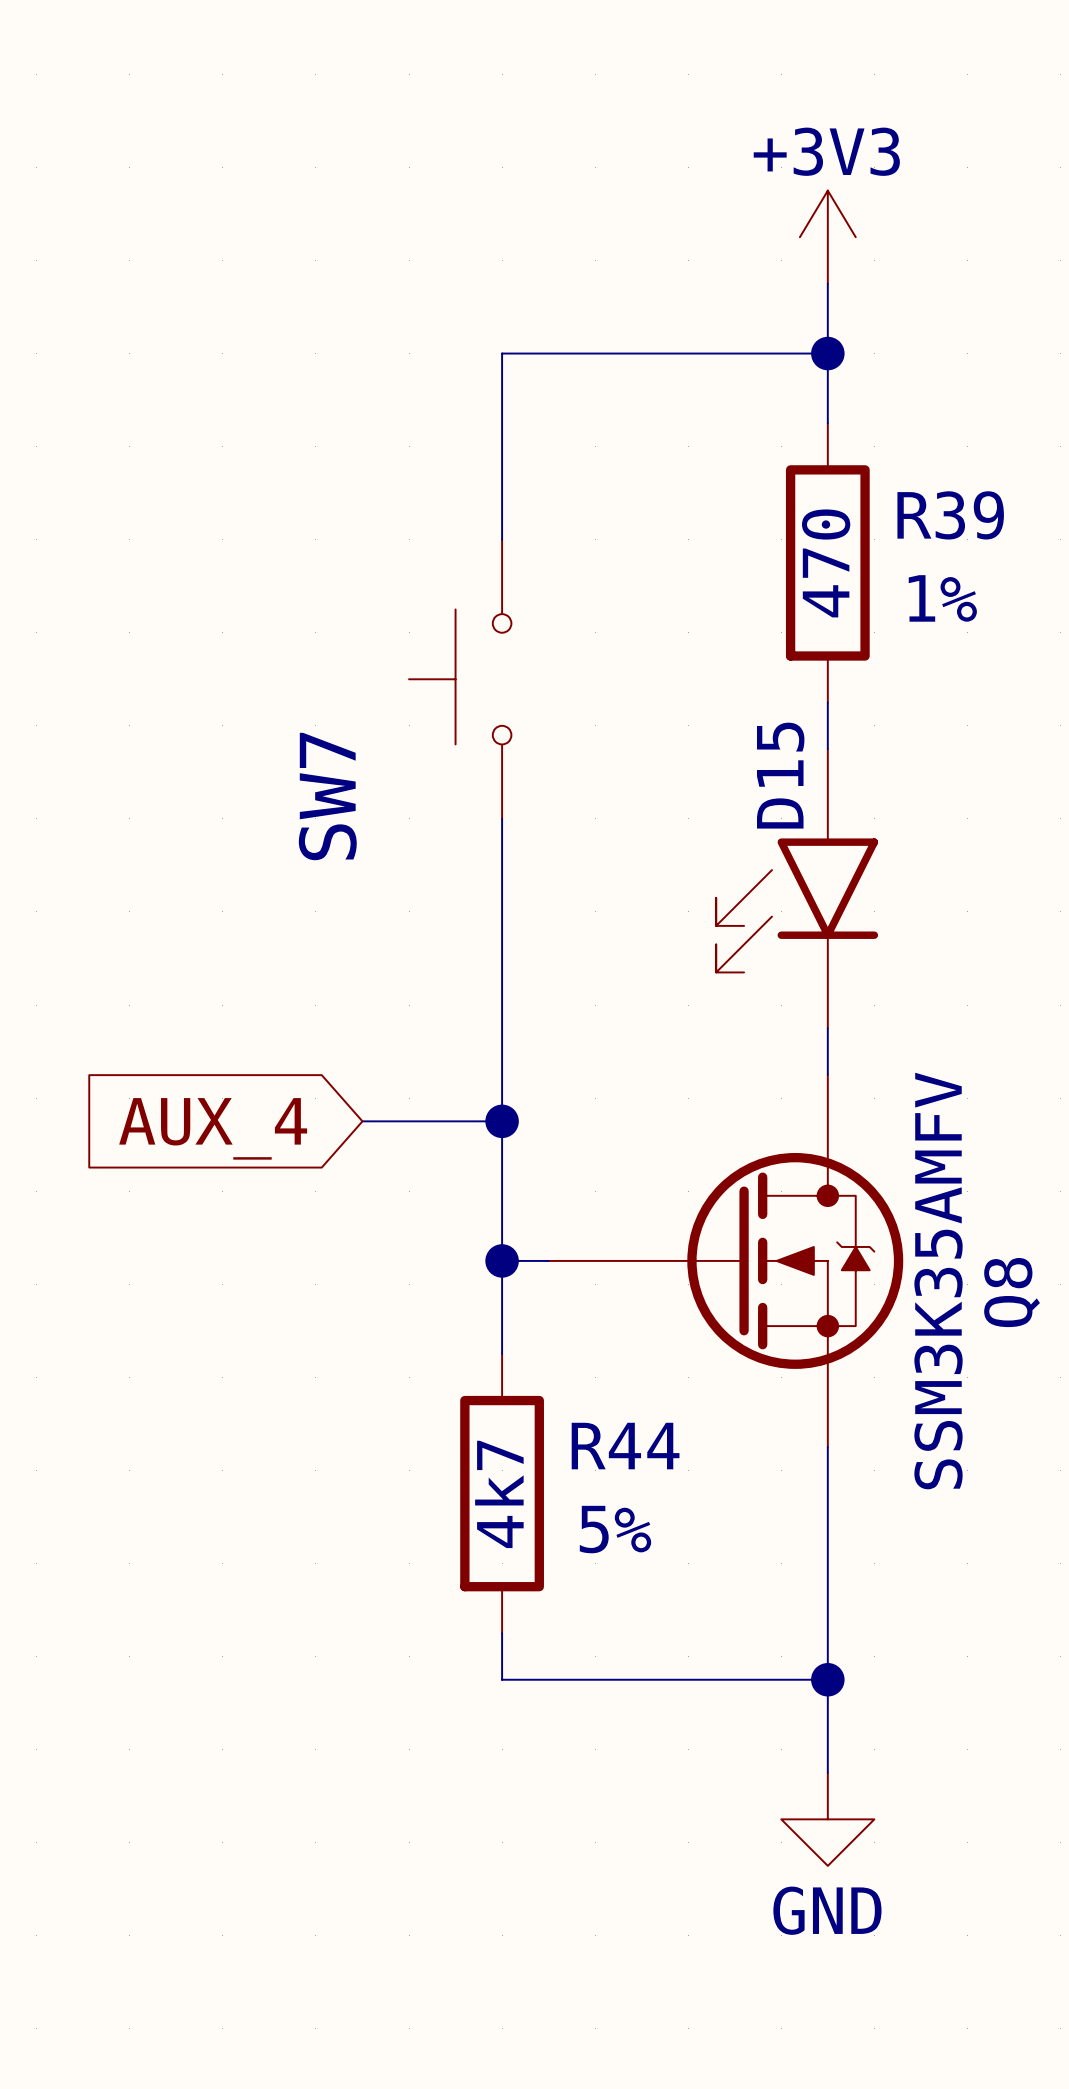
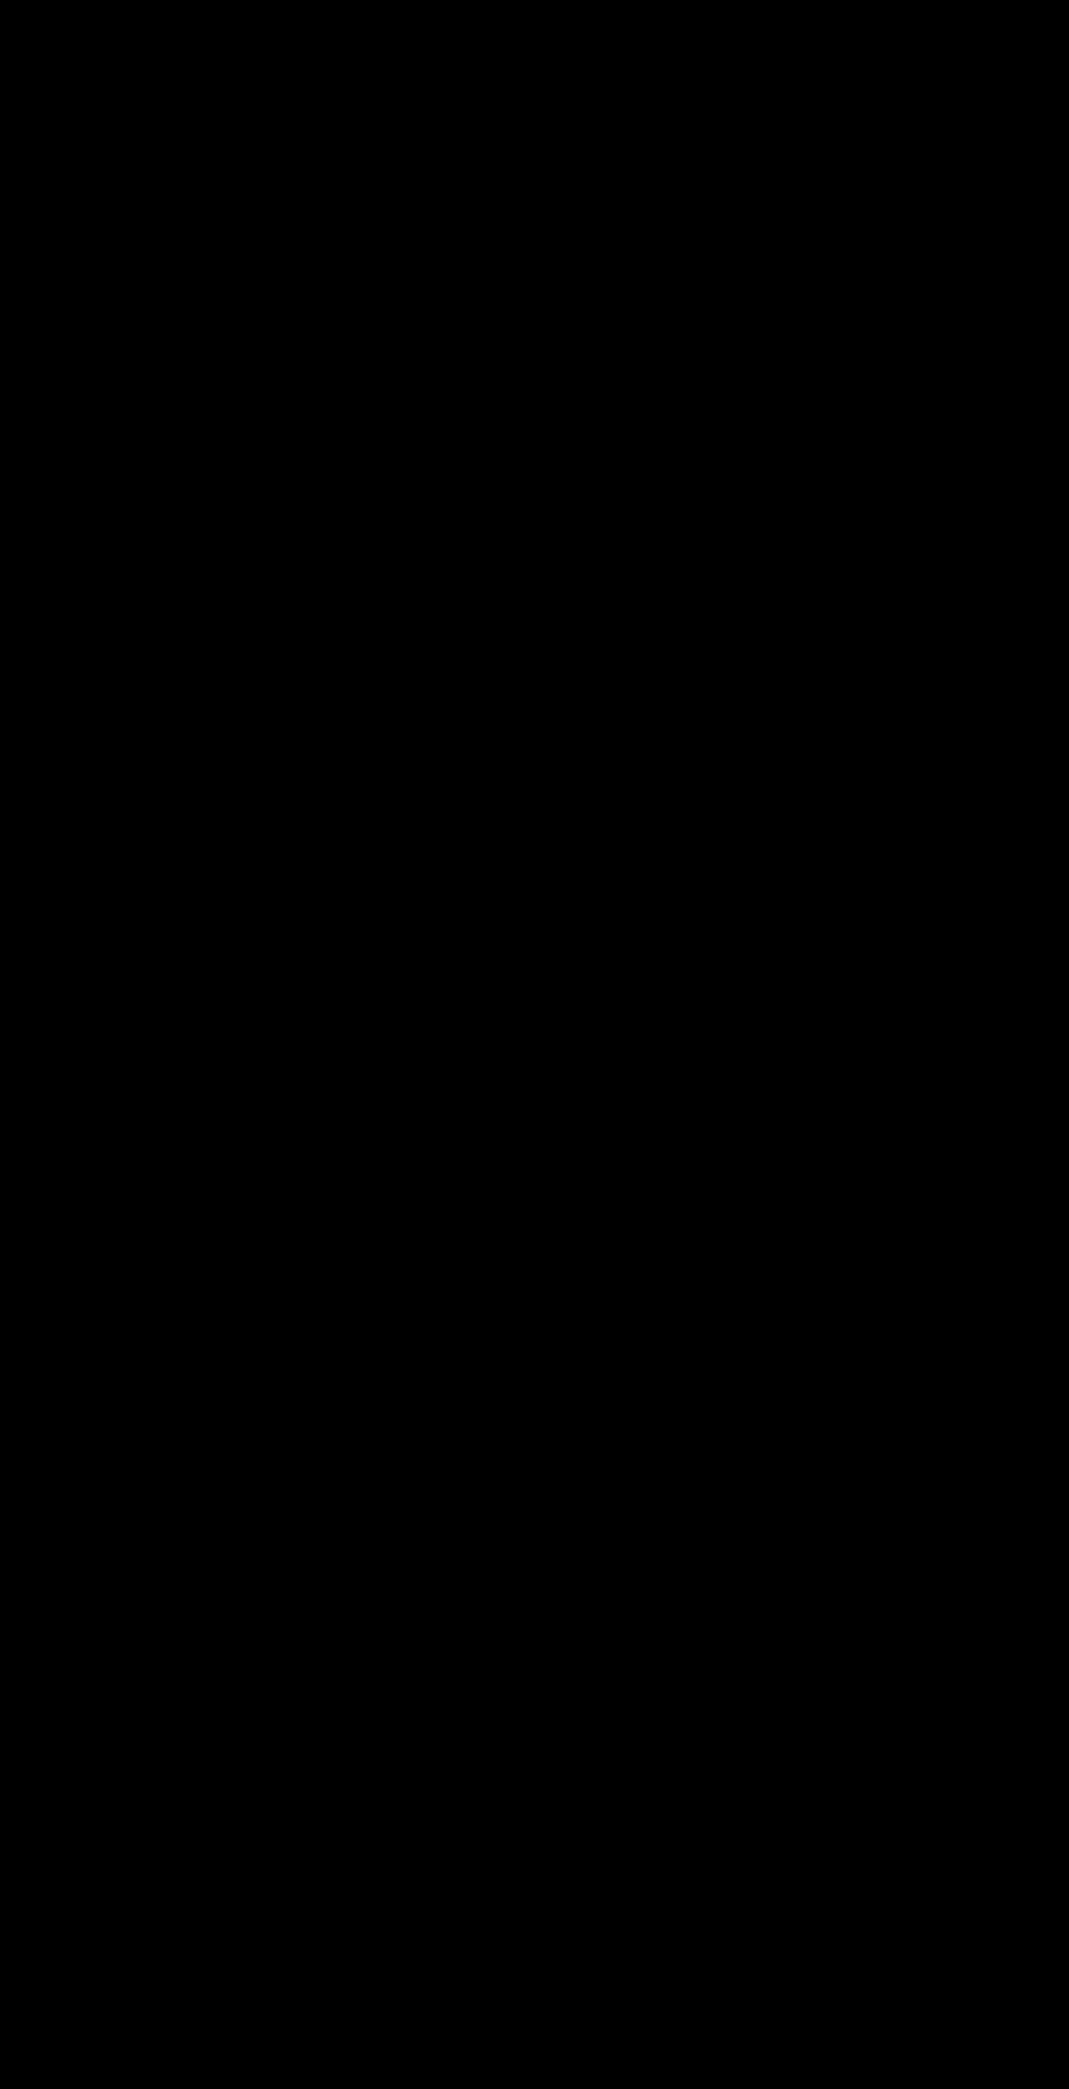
power symbol: +3V3 (827, 237) -> none
wire: (827, 283) (827, 423) -> none
wire: (827, 353) (502, 353) (502, 539) -> none
junction: (827, 353) -> none
R39: (827, 562) -> none
SW7: (460, 679) -> none
wire: (827, 702) (827, 749) -> none
wire: (502, 818) (502, 1354) -> none
D15: (797, 888) -> none
wire: (827, 1028) (827, 1074) -> none
wire: (362, 1121) (502, 1121) -> none
junction: (502, 1121) -> none
global label: AUX_4 (213, 1128) -> none
wire: (502, 1260) (548, 1260) -> none
junction: (502, 1260) -> none
Q8: SSM3K35AMFV (725, 1260) -> none
wire: (827, 1447) (827, 1772) -> none
R44: (502, 1493) -> none
wire: (502, 1633) (502, 1679) (827, 1679) -> none
junction: (827, 1679) -> none
power symbol: GND (827, 1819) -> none

